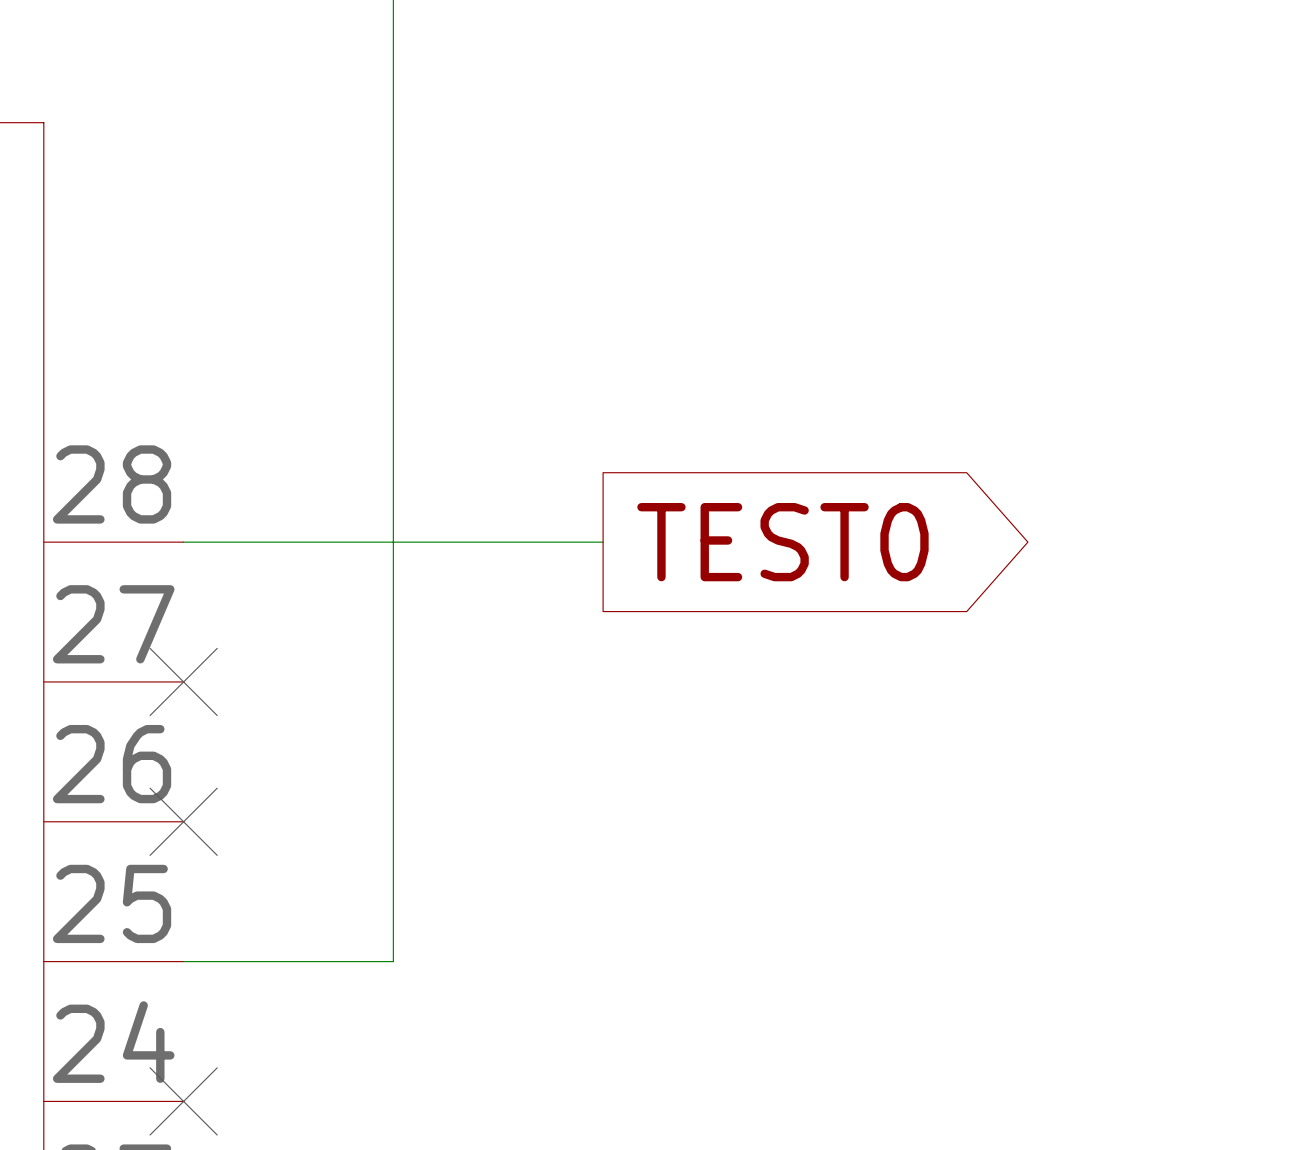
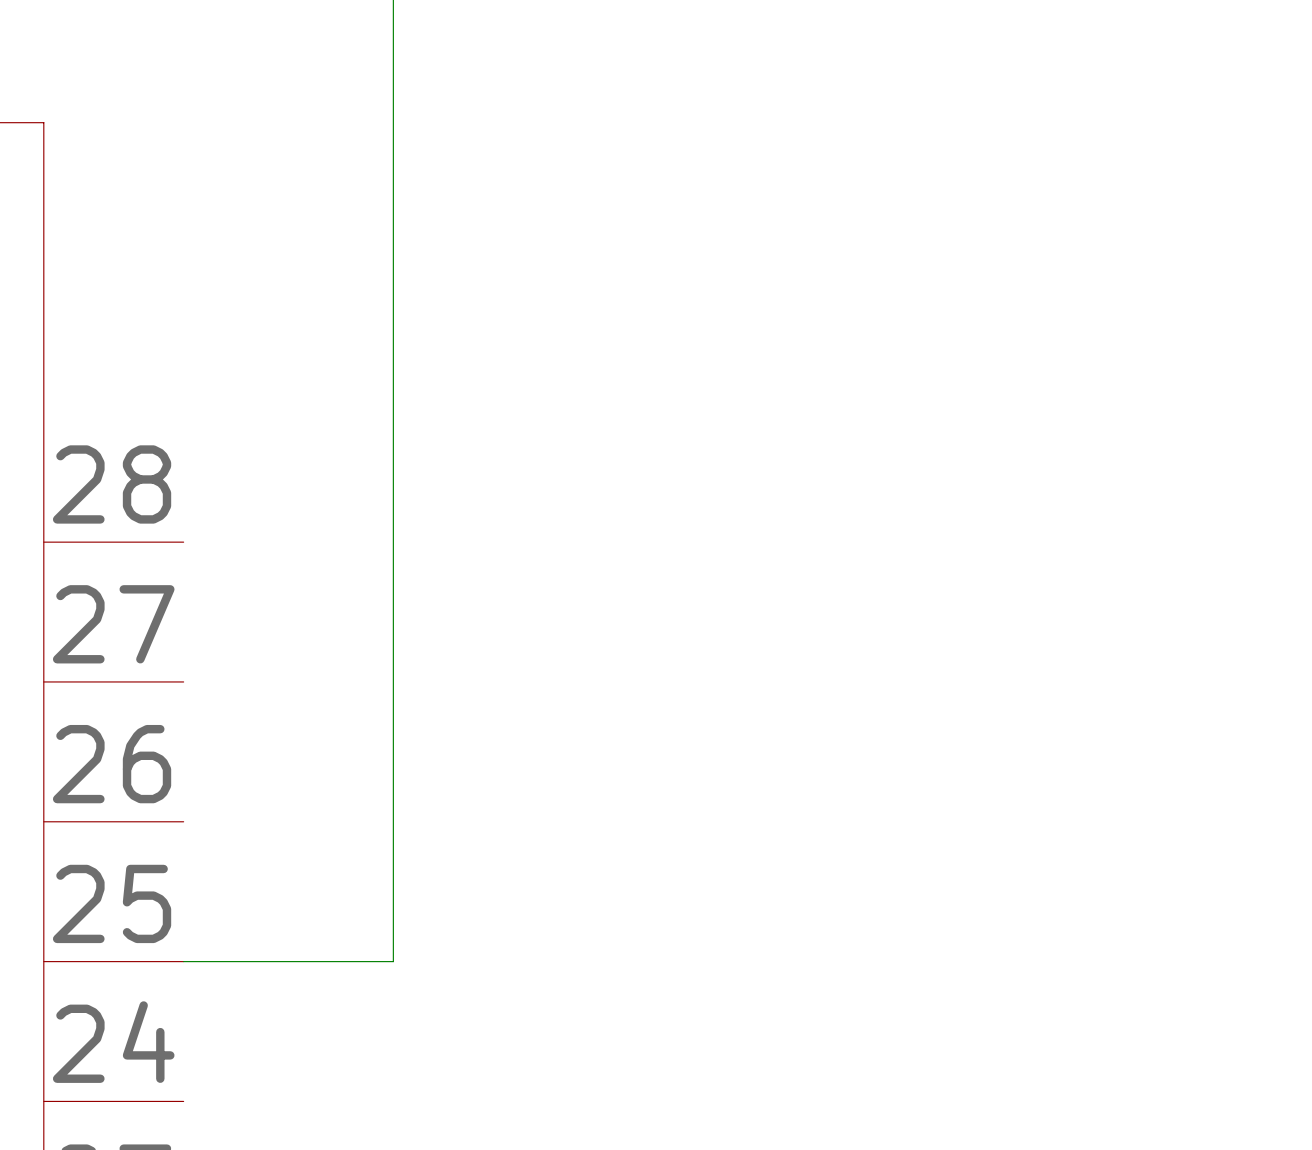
wire: (183, 542) (603, 542) -> none
global label: TEST0 (782, 542) -> none
no-connect mark: (183, 681) -> none
no-connect mark: (183, 821) -> none
no-connect mark: (183, 1101) -> none

